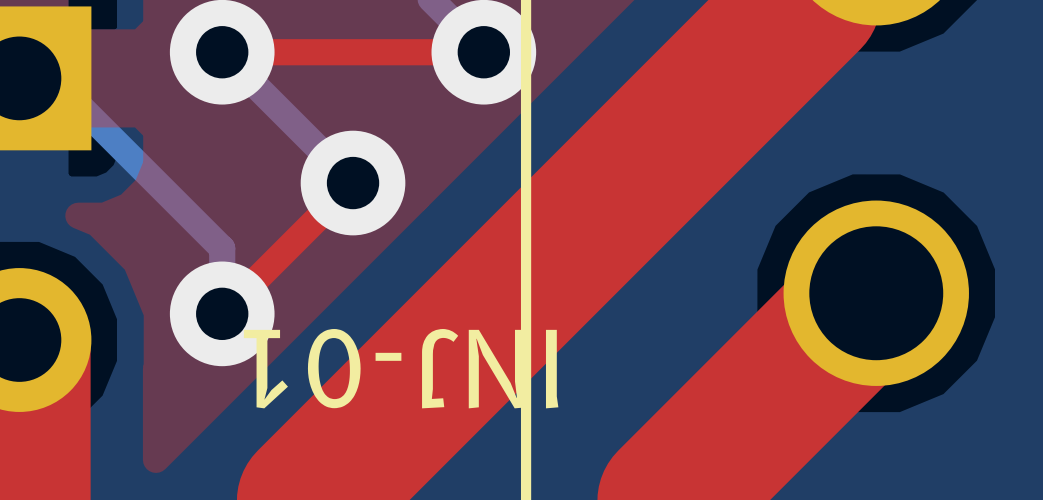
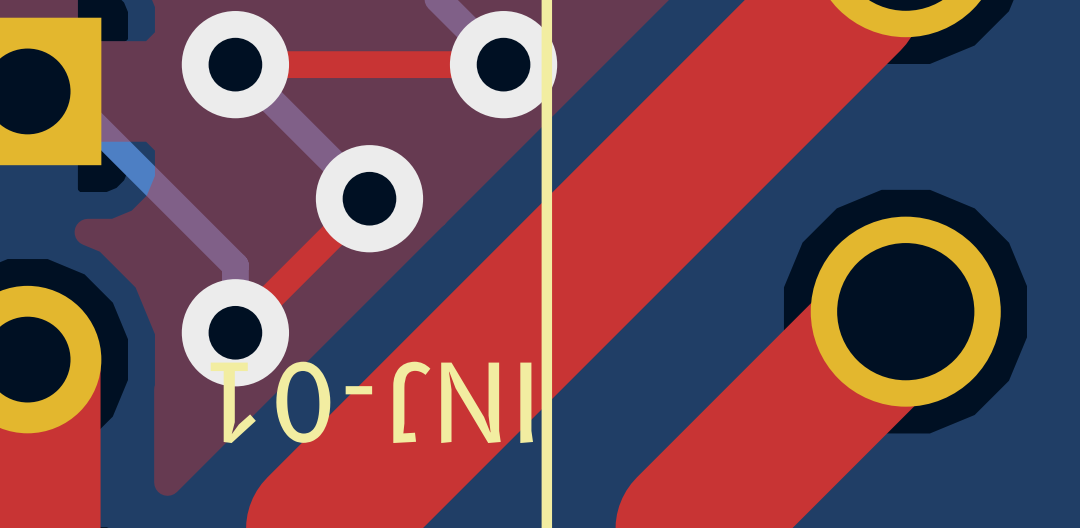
text position: INJ-01 (401, 368) -> INJ-01 (371, 402)

